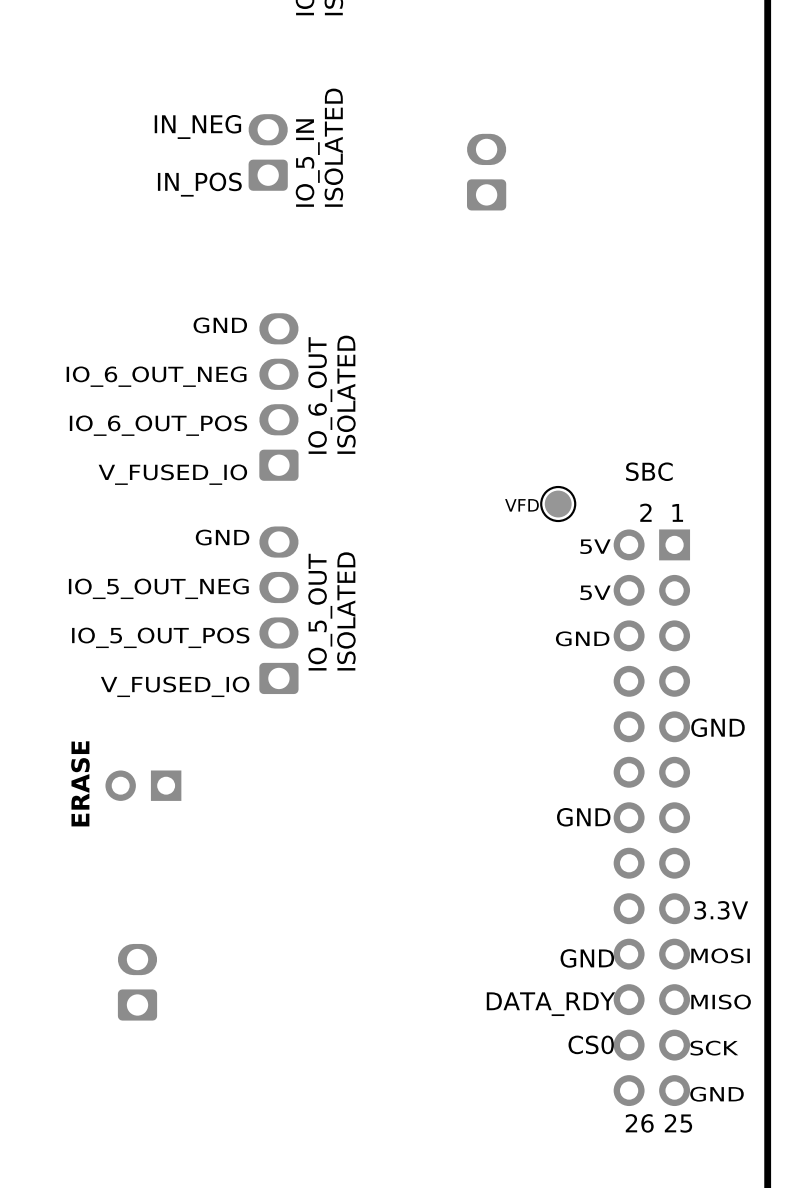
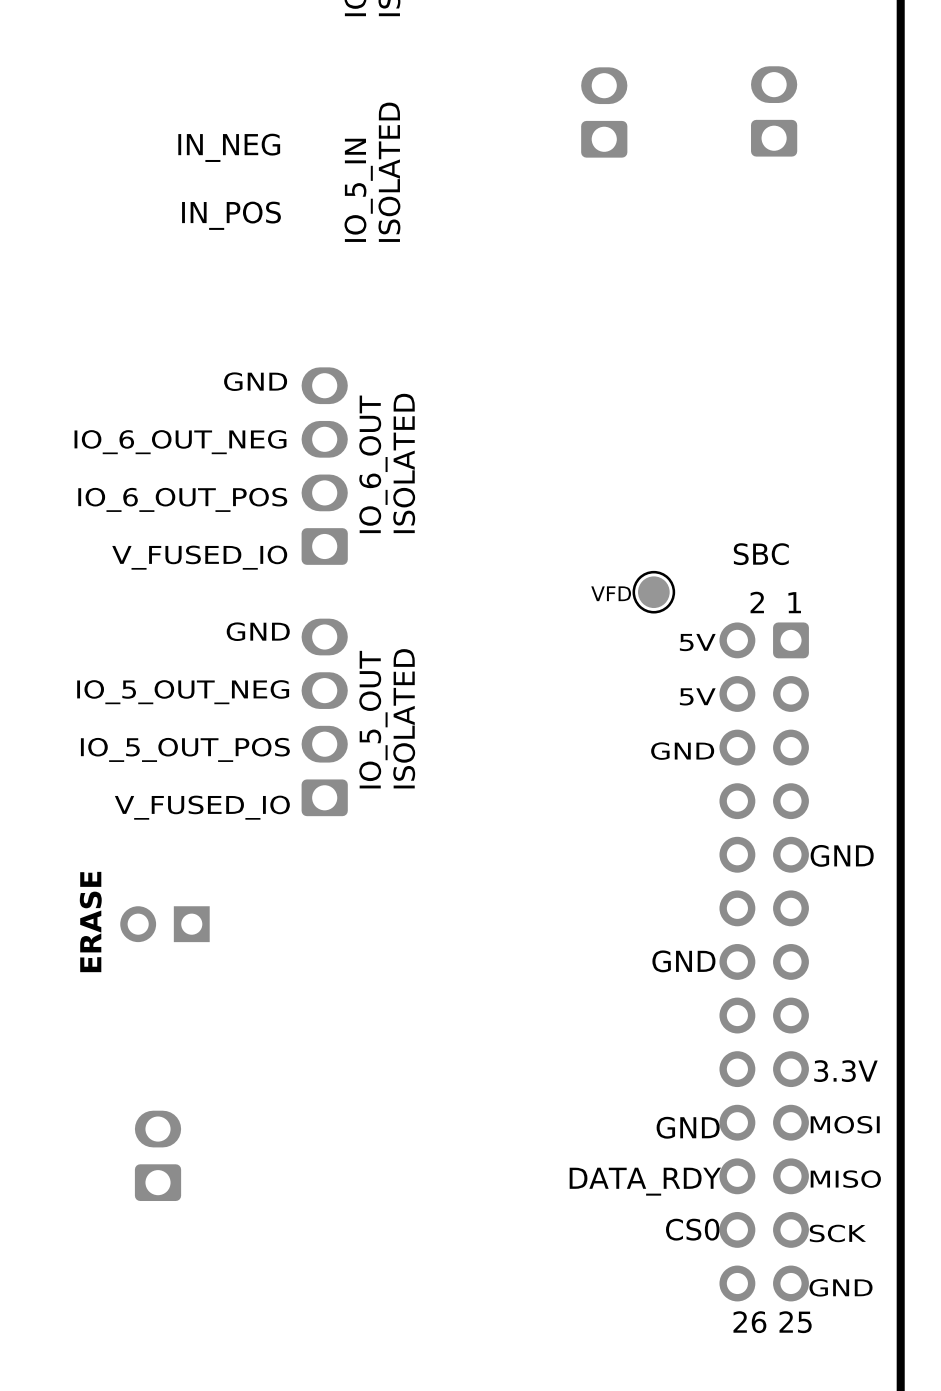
part: none -> (774, 111)
part: (268, 152) -> none
part position: (486, 172) -> (604, 112)
part footprint: [613, 529, 691, 1107] -> [719, 622, 809, 1302]

